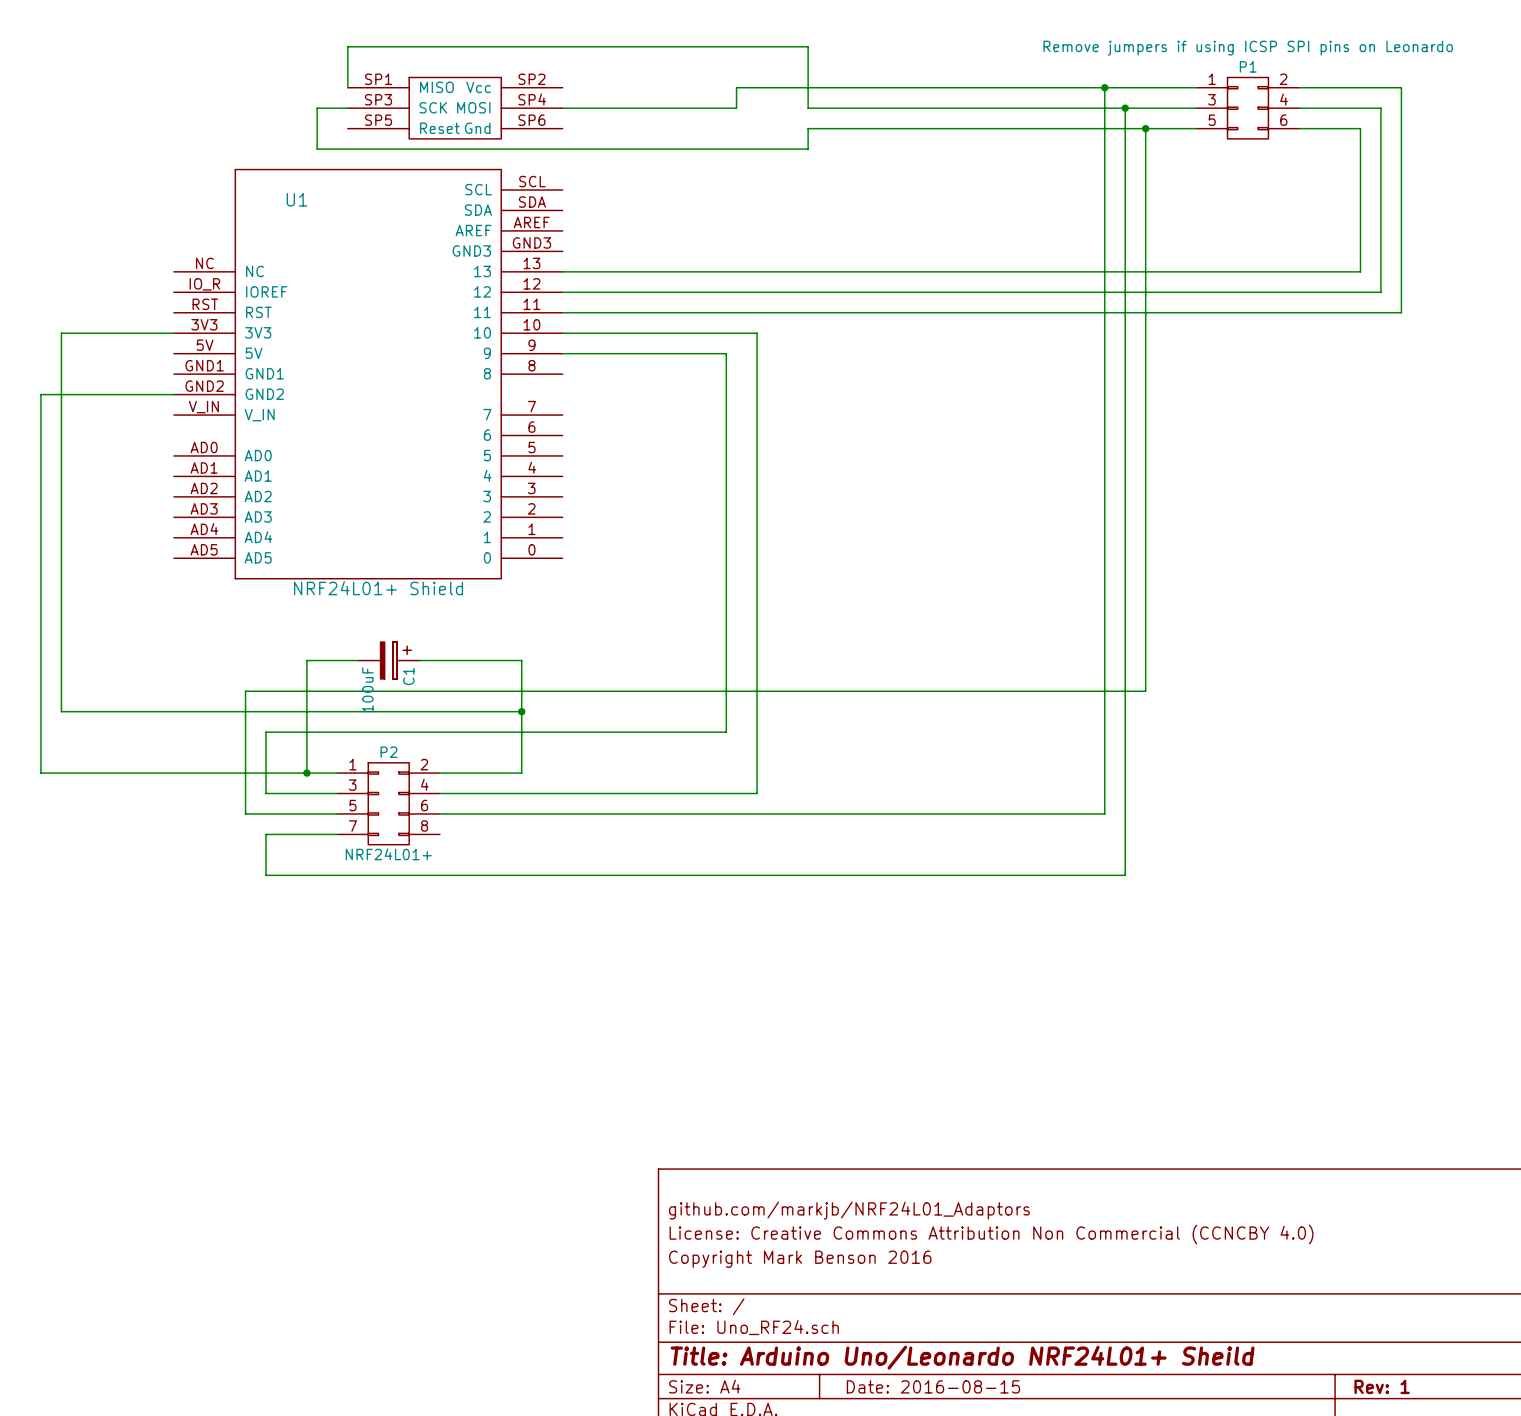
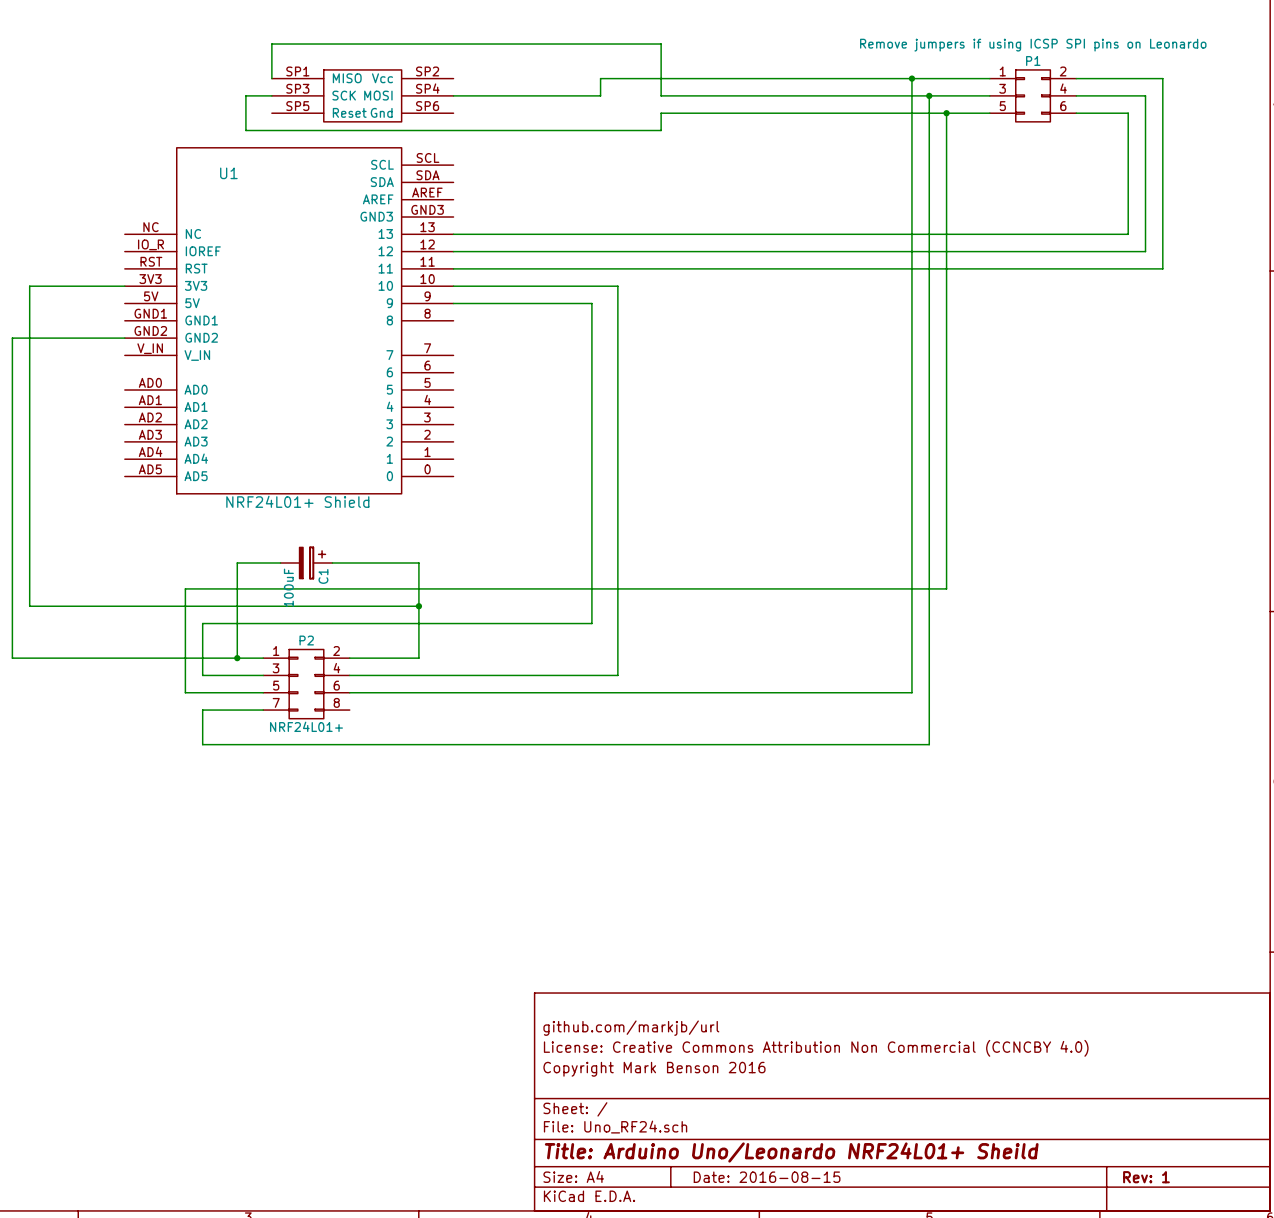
title block: github.com/markjb/NRF24L01_Adaptors (849, 1210) -> github.com/markjb/url (631, 1028)

